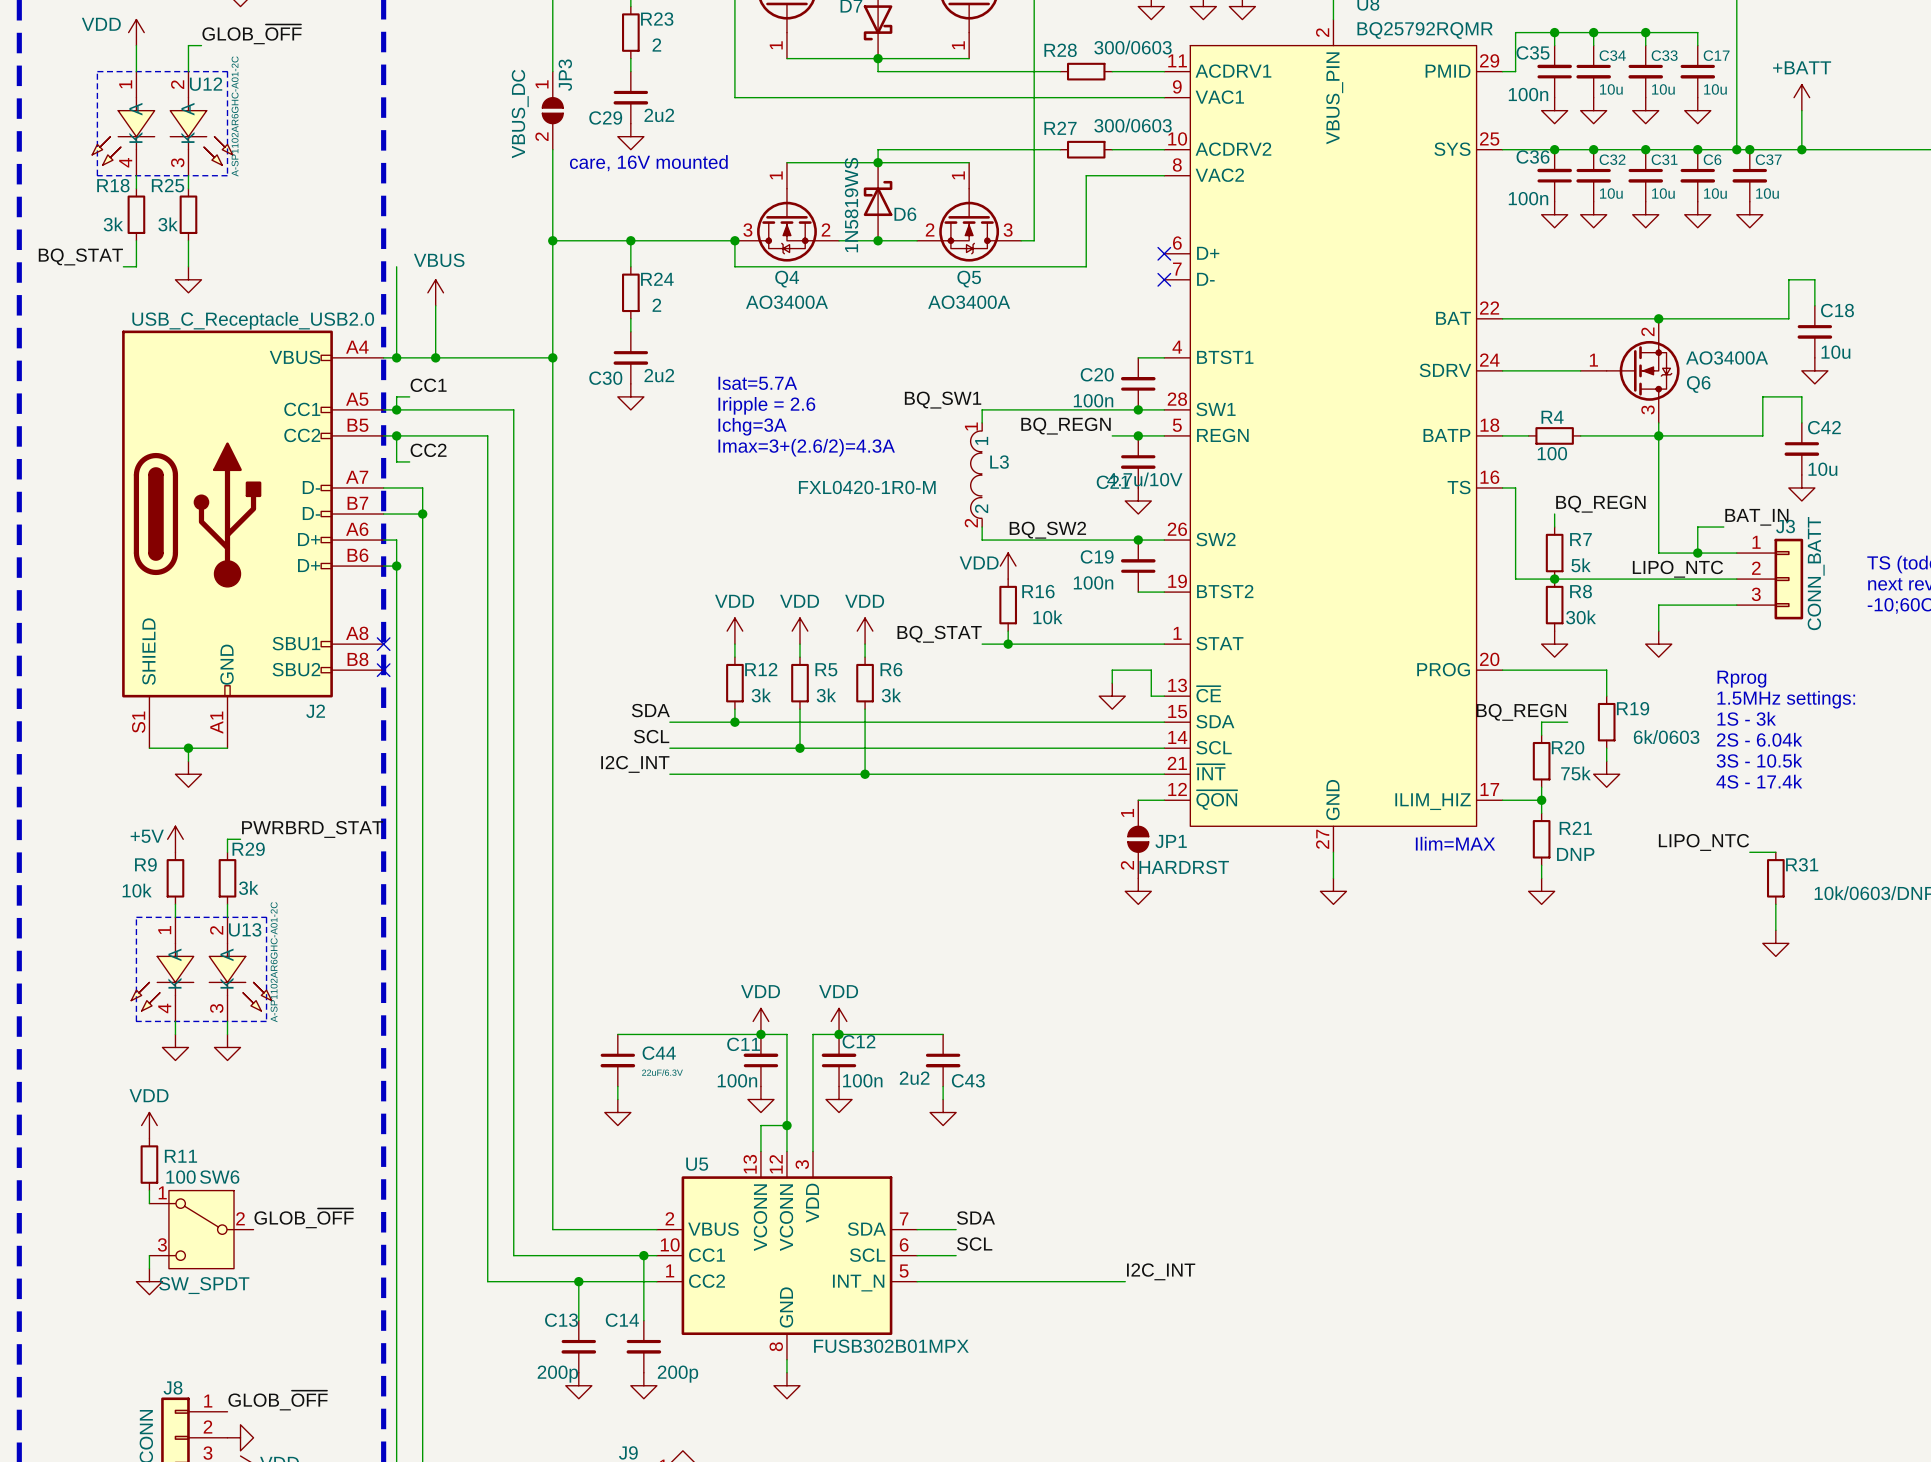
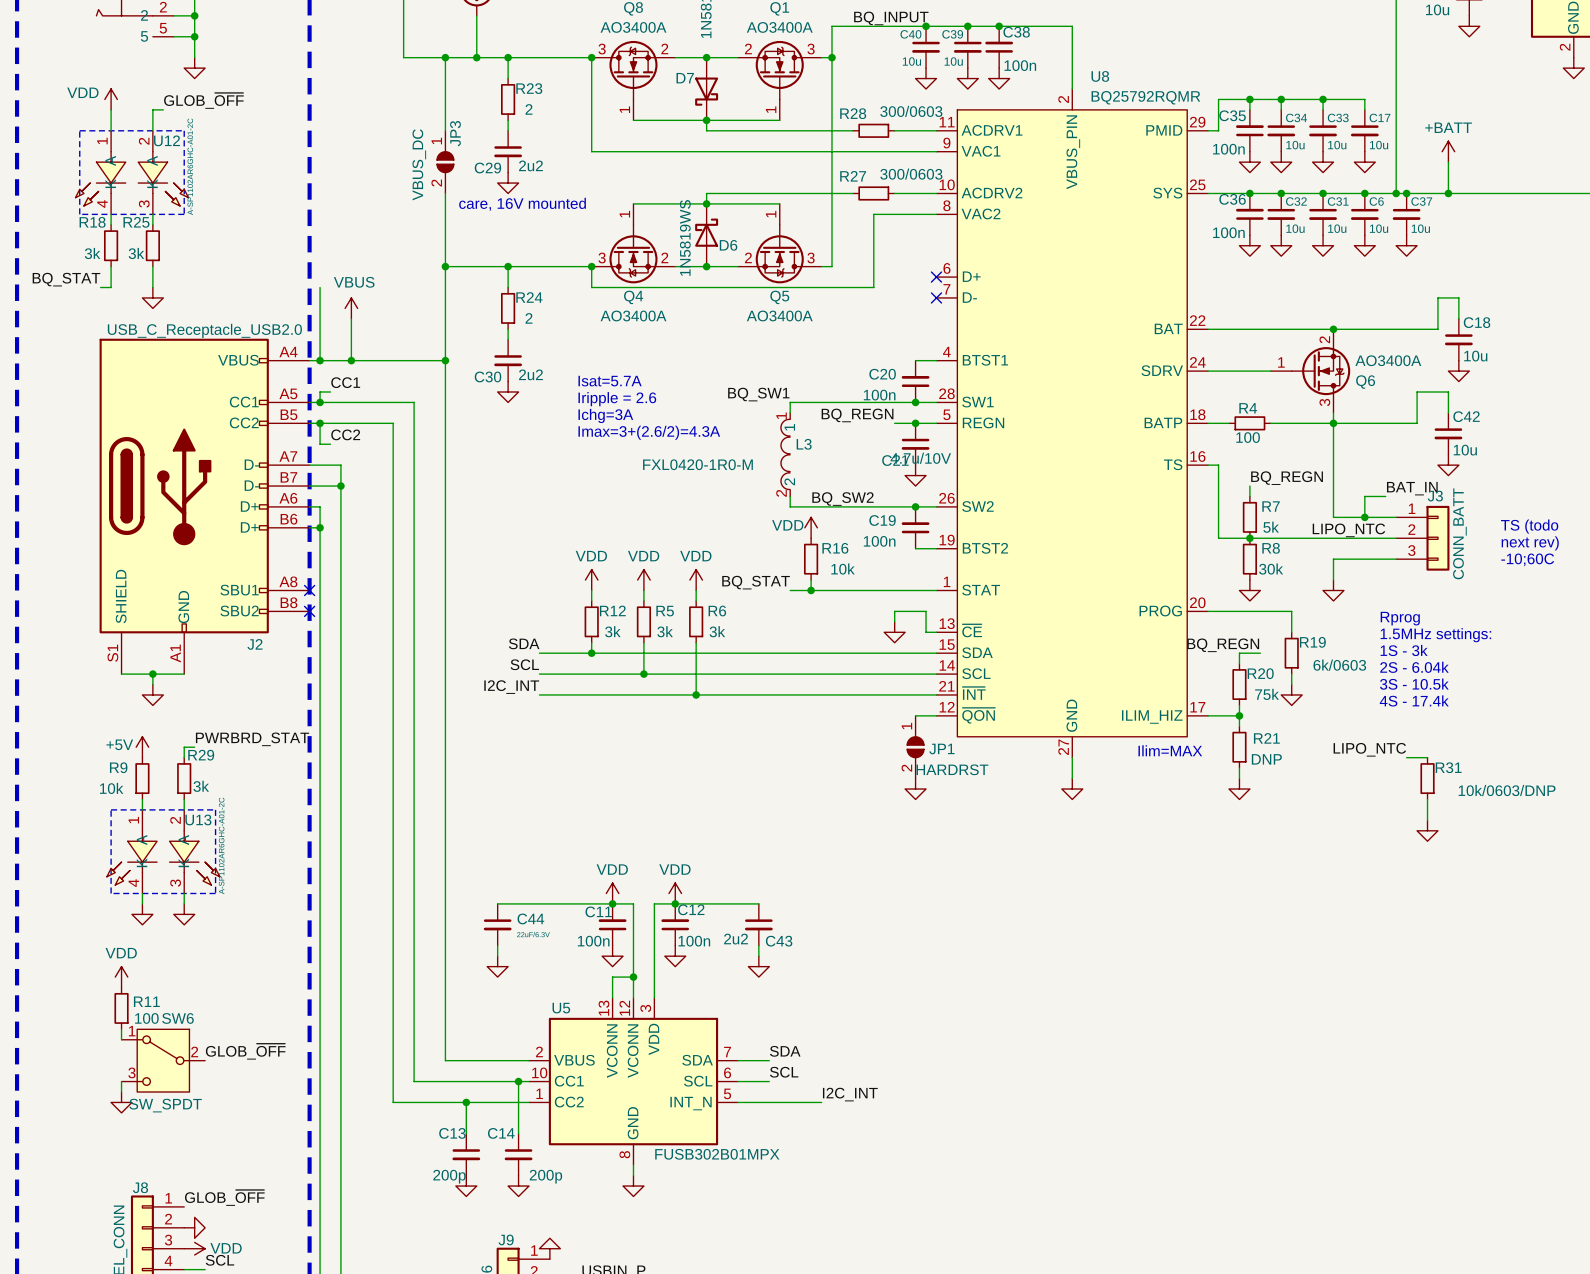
label position: I2C_INT (1161, 1271) -> I2C_INT (850, 1094)
wire: (1021, 1281) (1125, 1281) -> none

